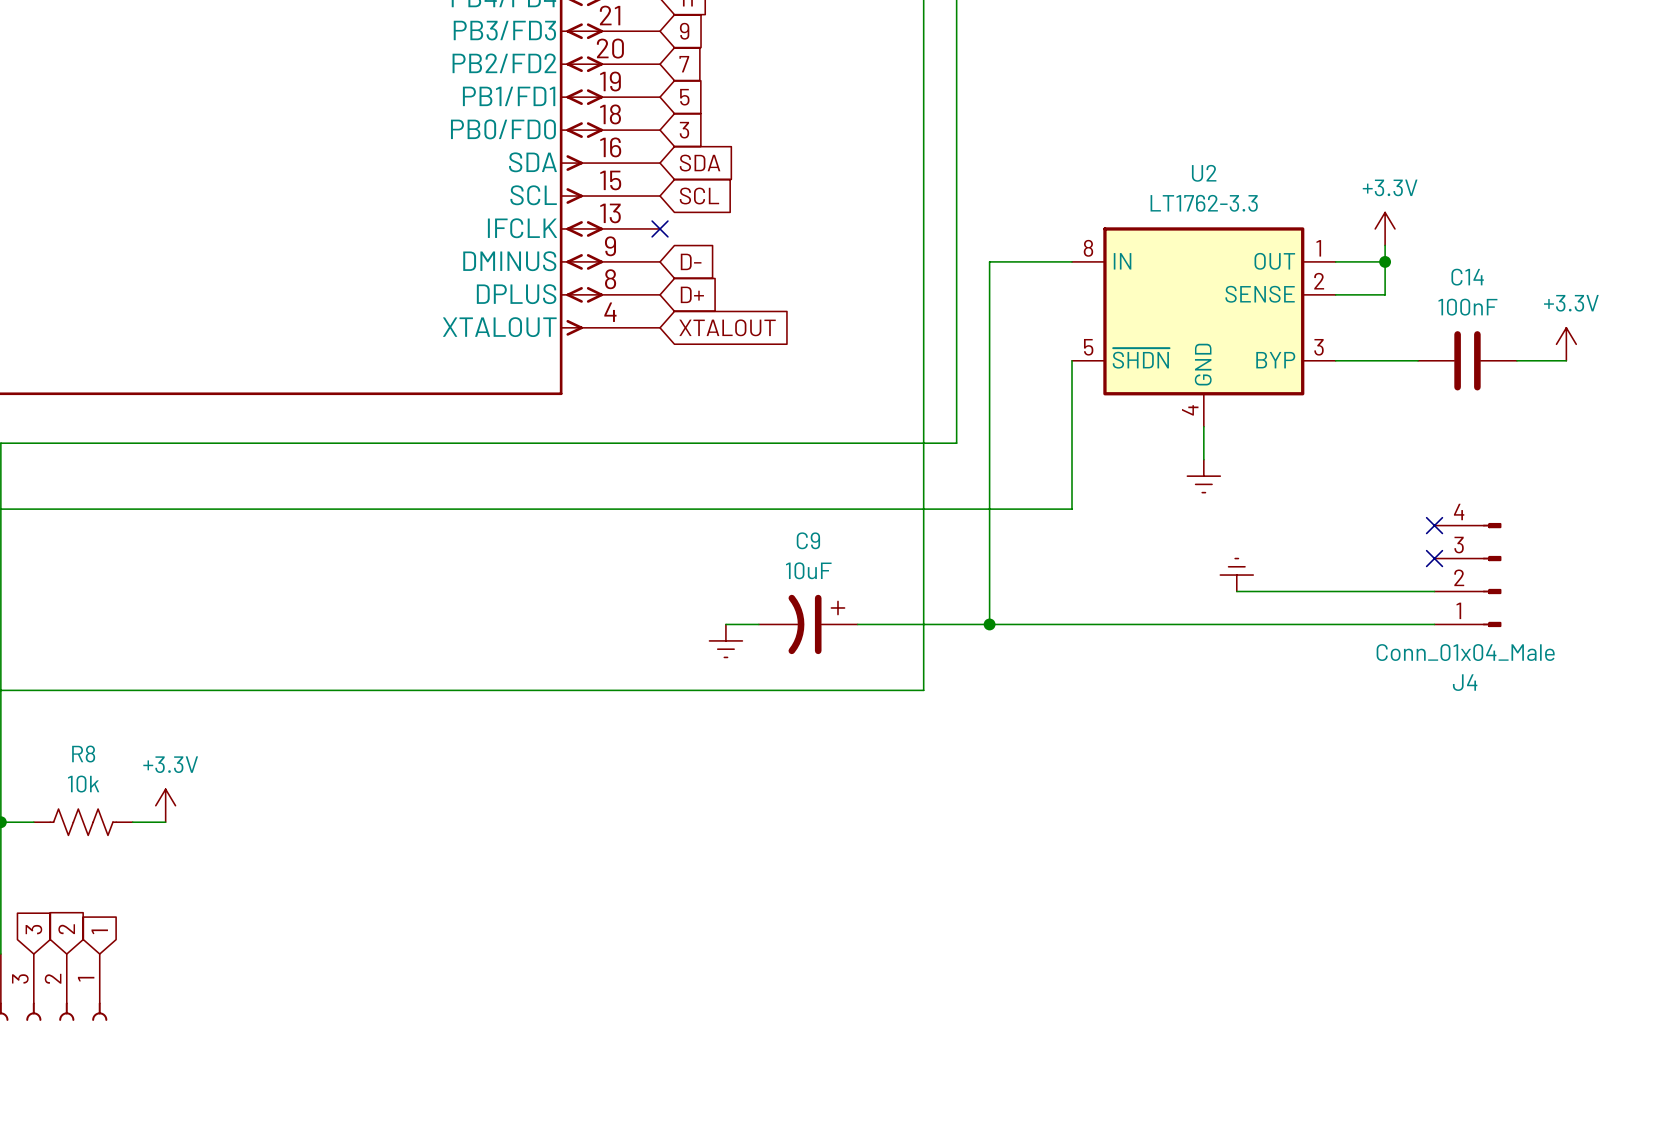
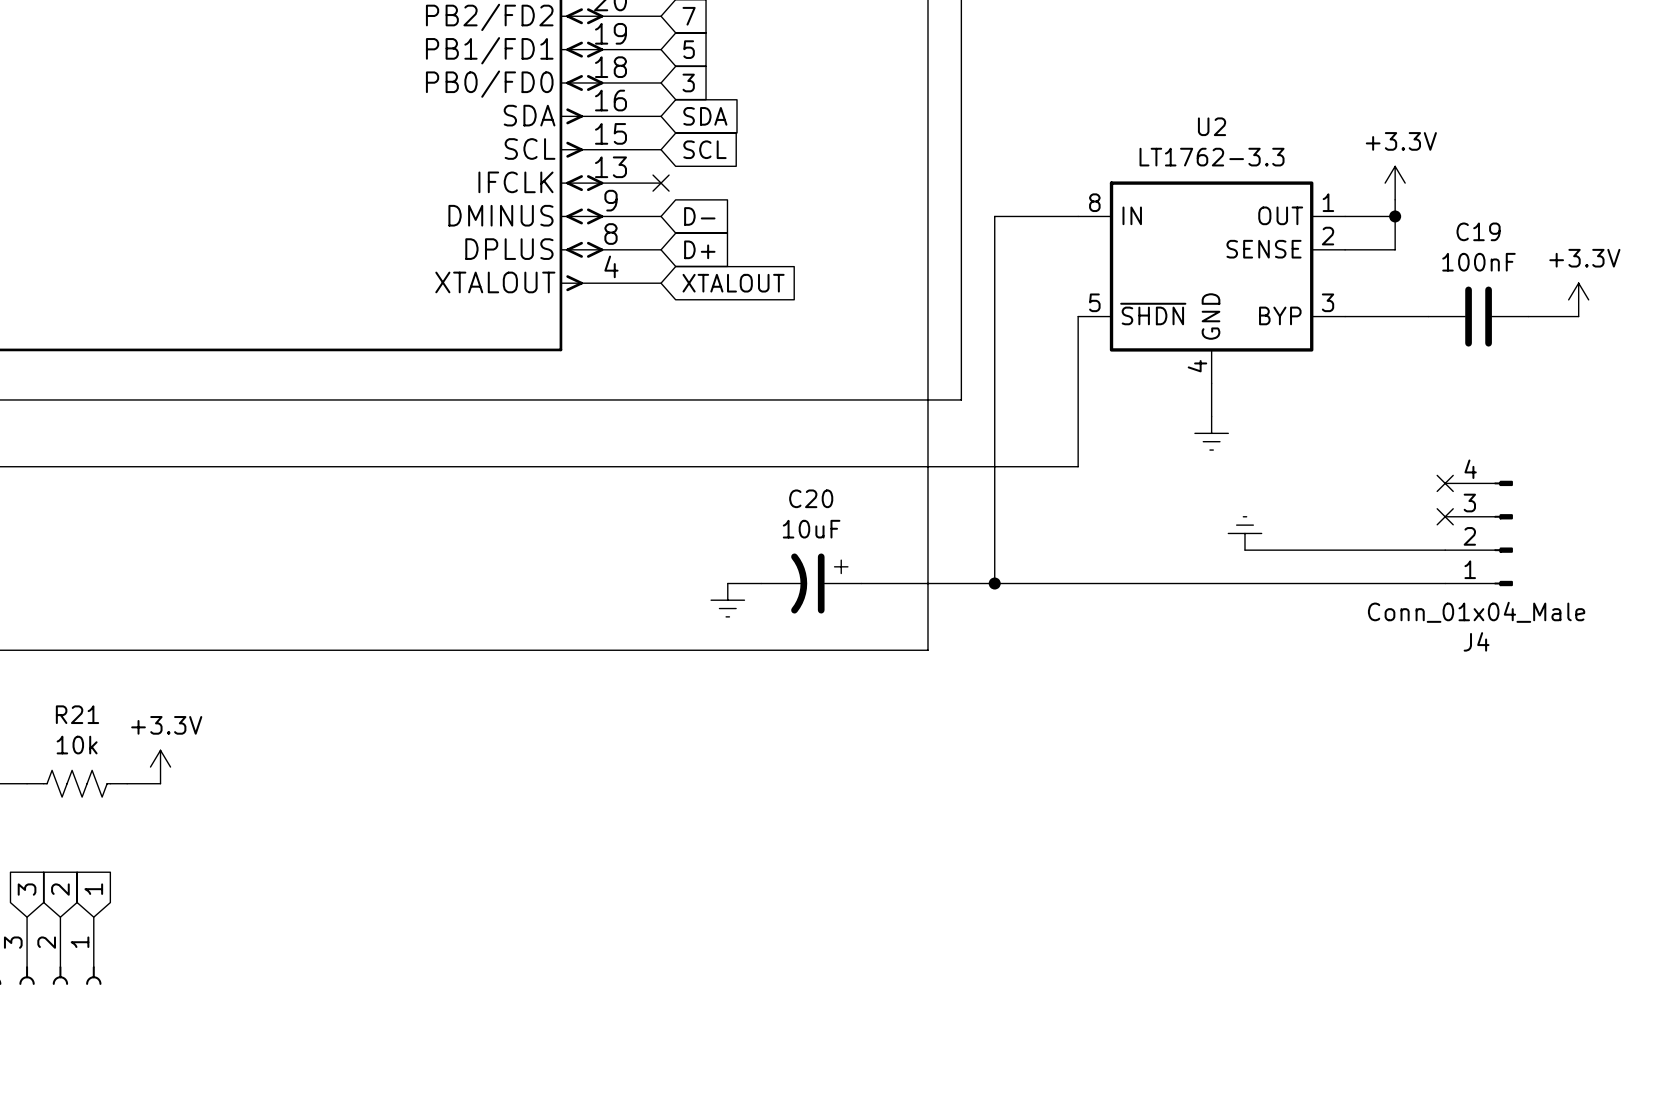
C14 name: C14 (1467, 277) -> C19 (1478, 231)
C9 name: C9 (808, 540) -> C20 (811, 498)
R8 name: R8 (83, 754) -> R21 (77, 714)

